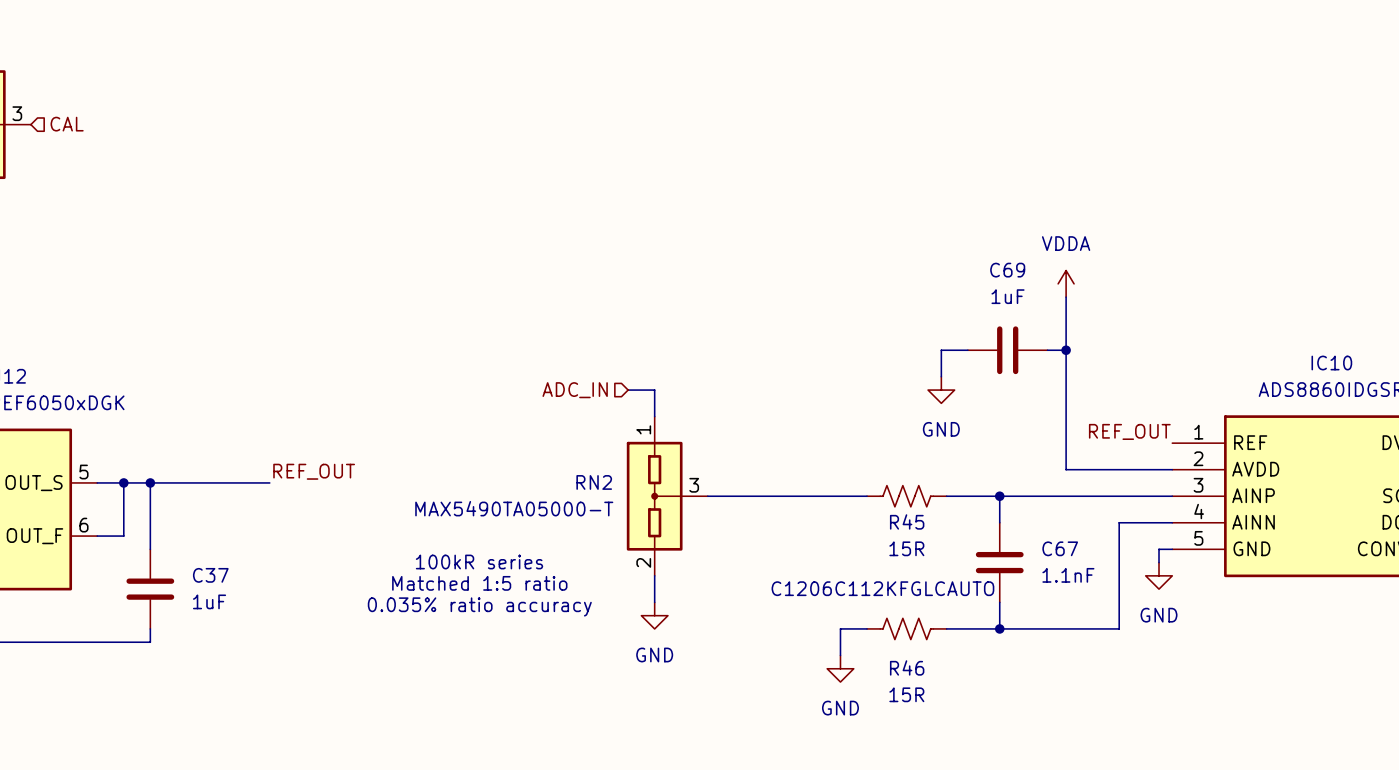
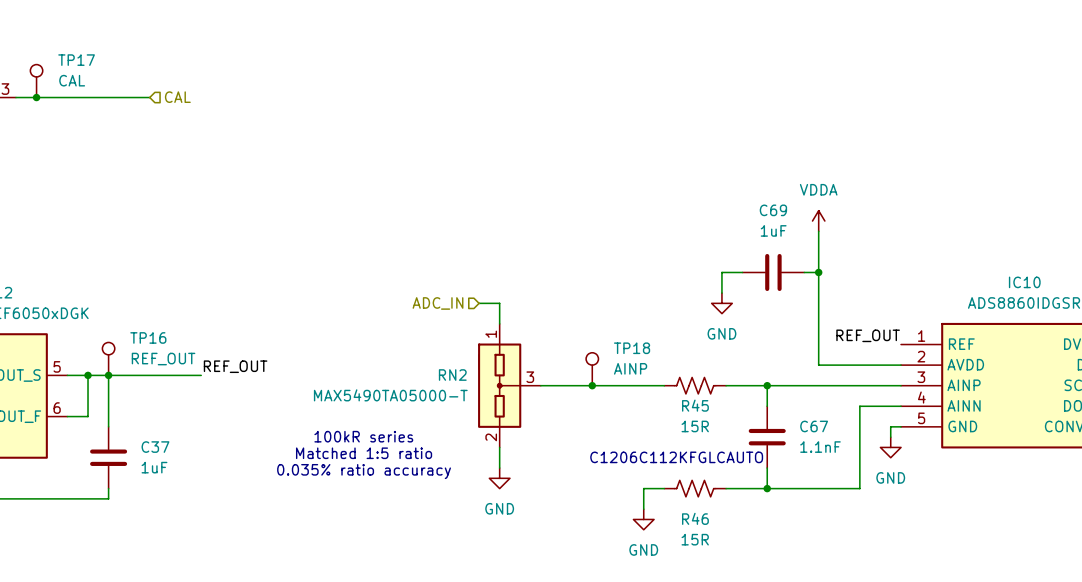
TP17: none -> CAL (36, 81)
wire: none -> (15, 97) (149, 97)
junction: none -> (36, 97)
hierarchical label position: CAL (67, 124) -> CAL (177, 97)
TP16: none -> REF_OUT (108, 358)
TP18: none -> AINP (592, 369)
junction: none -> (592, 385)

